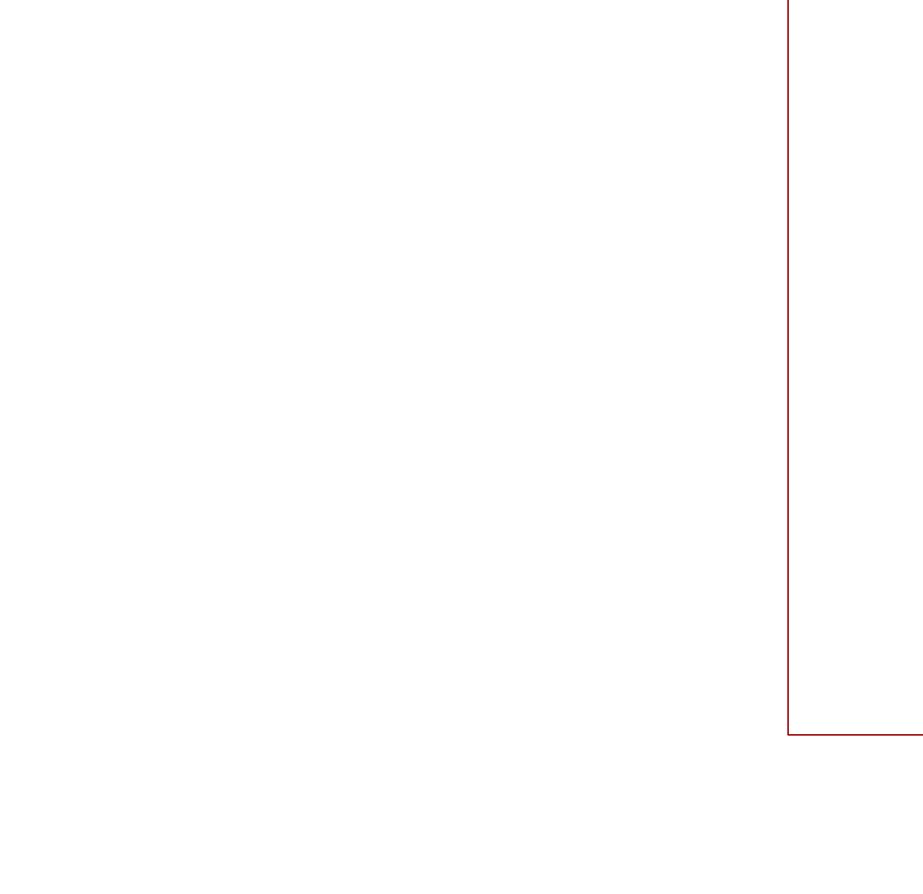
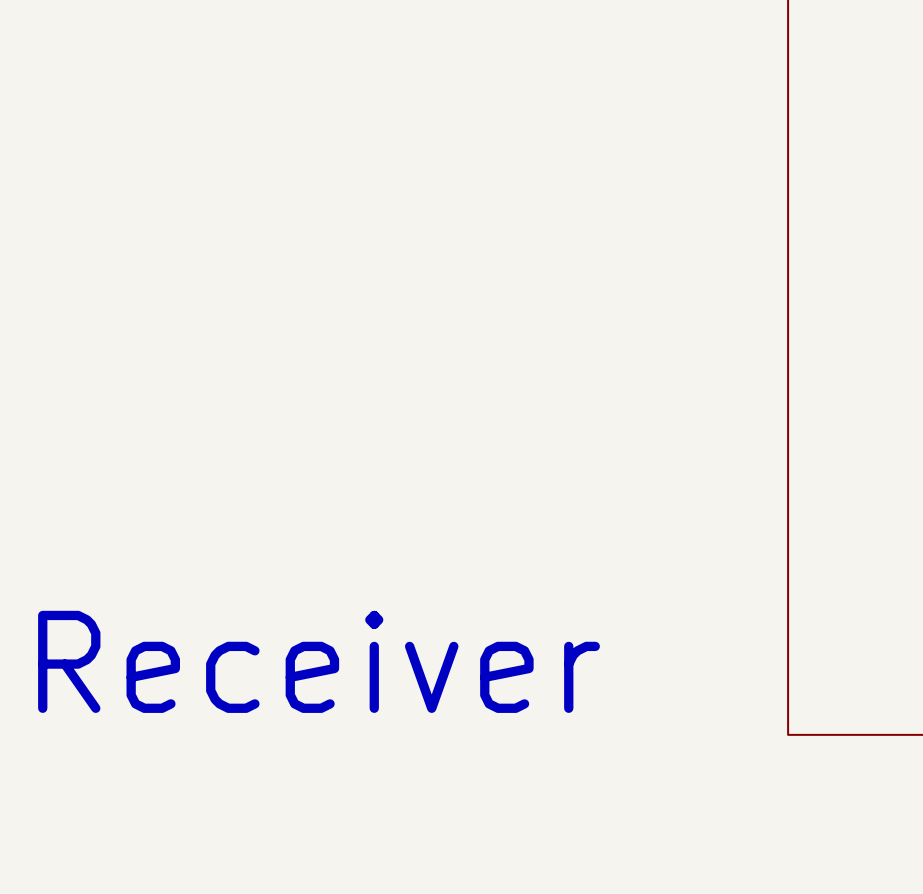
text: none -> Receiver (319, 661)

